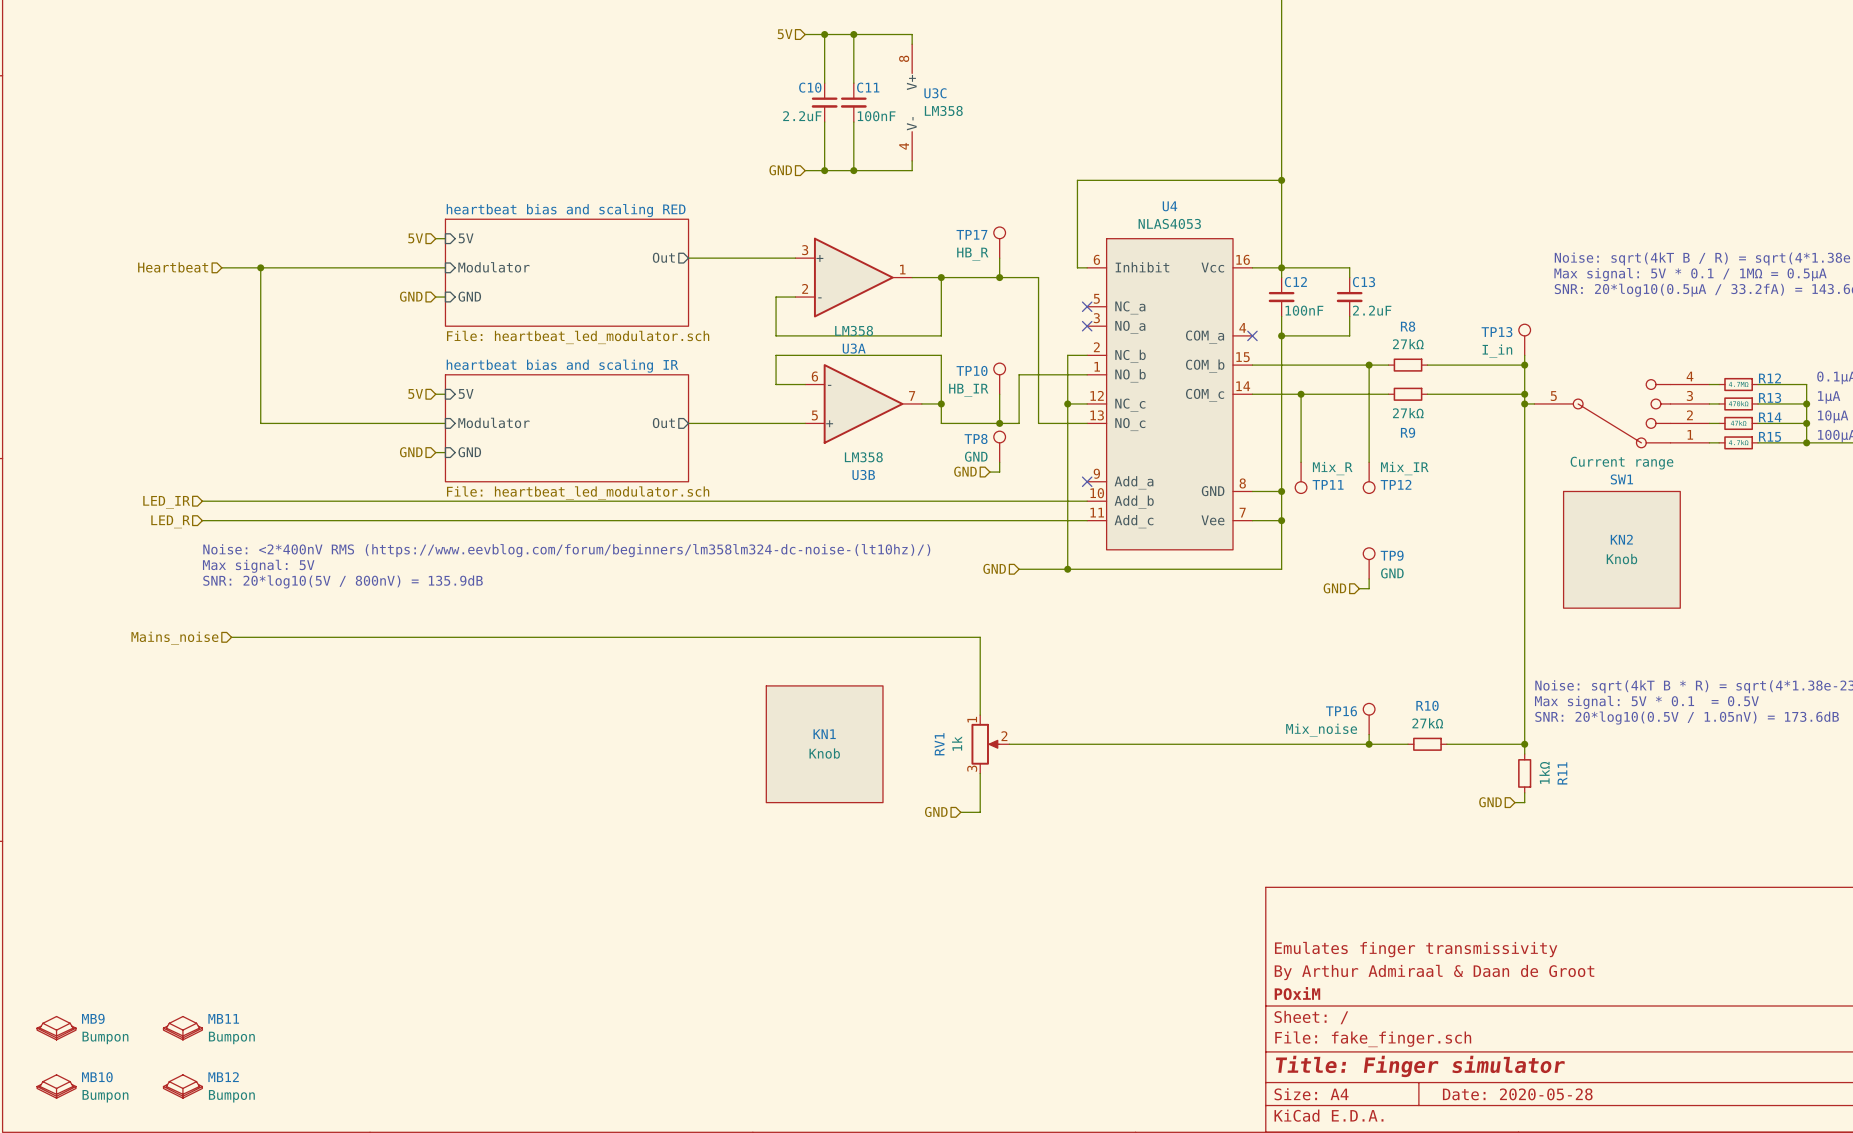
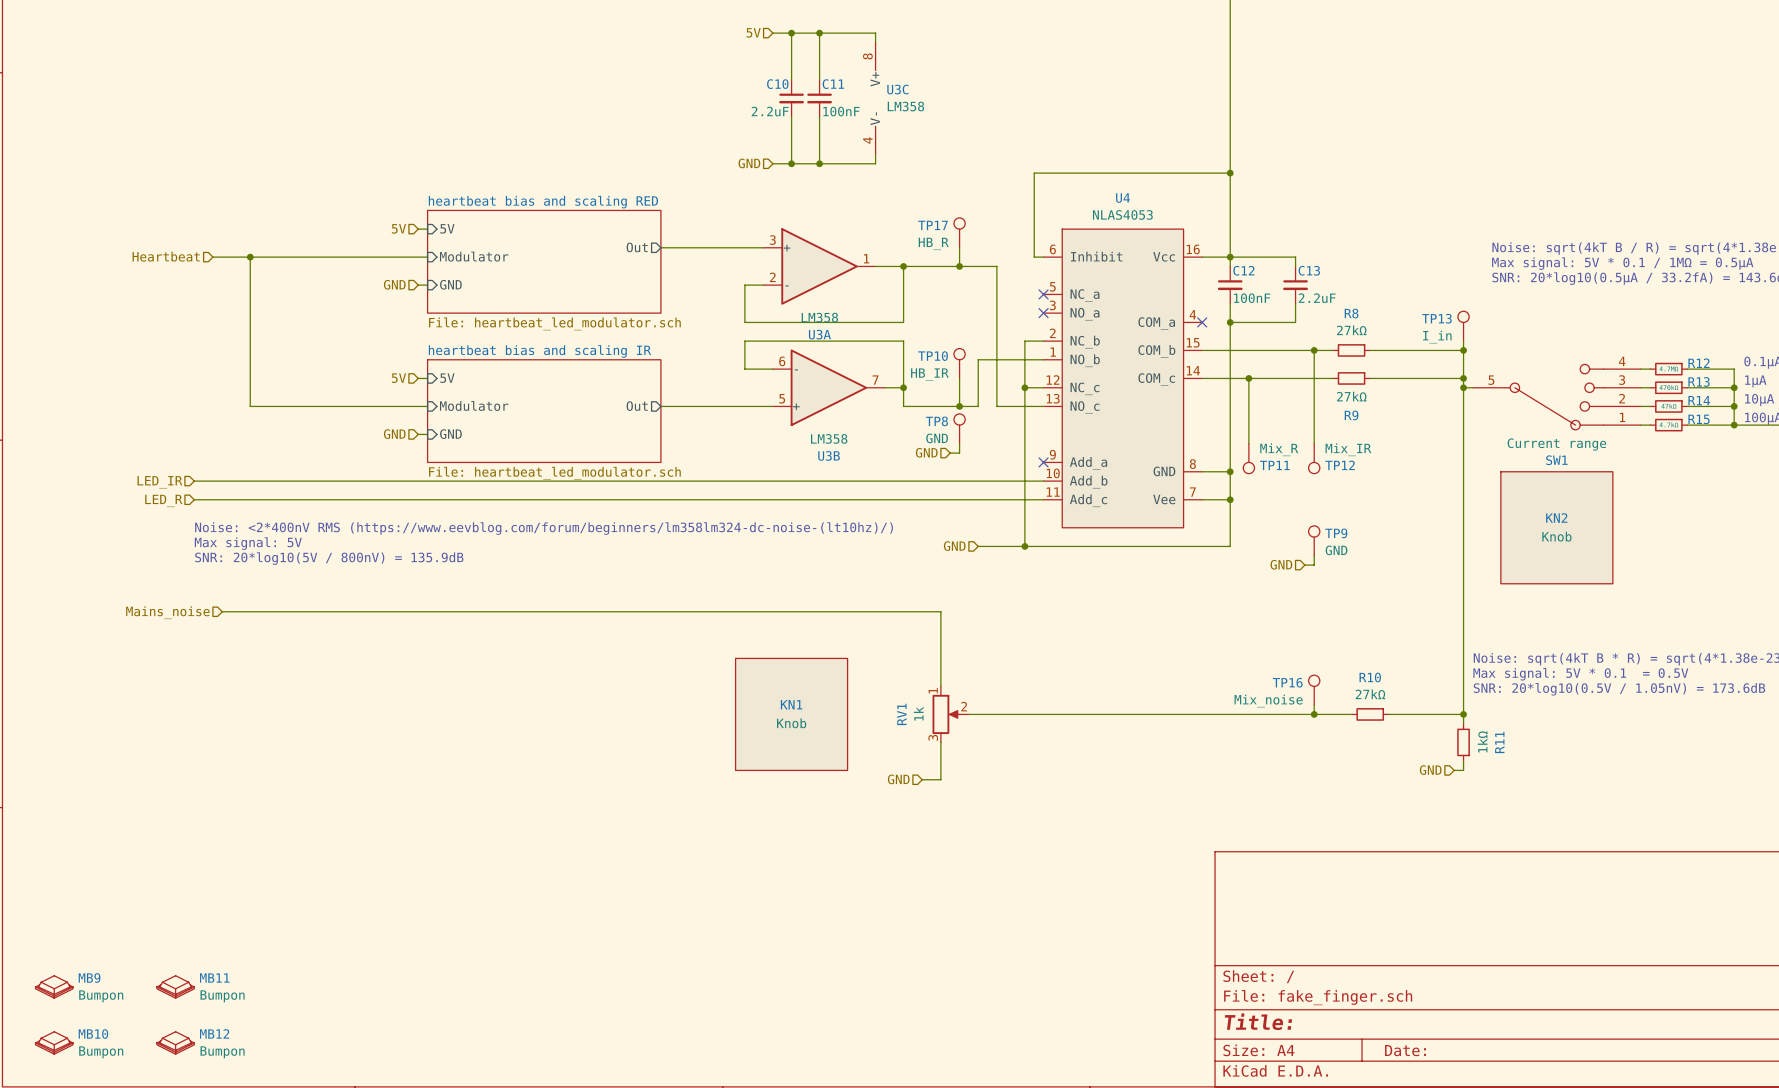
title block: Emulates finger transmissivity (1416, 949) -> none
title block: By Arthur Admiraal & Daan de Groot (1434, 972) -> none
title block: POxiM (1297, 993) -> none
title block: Title: Finger simulator (1420, 1066) -> Title: (1258, 1021)
title block: Date: 2020-05-28 (1517, 1094) -> Date: (1405, 1050)

